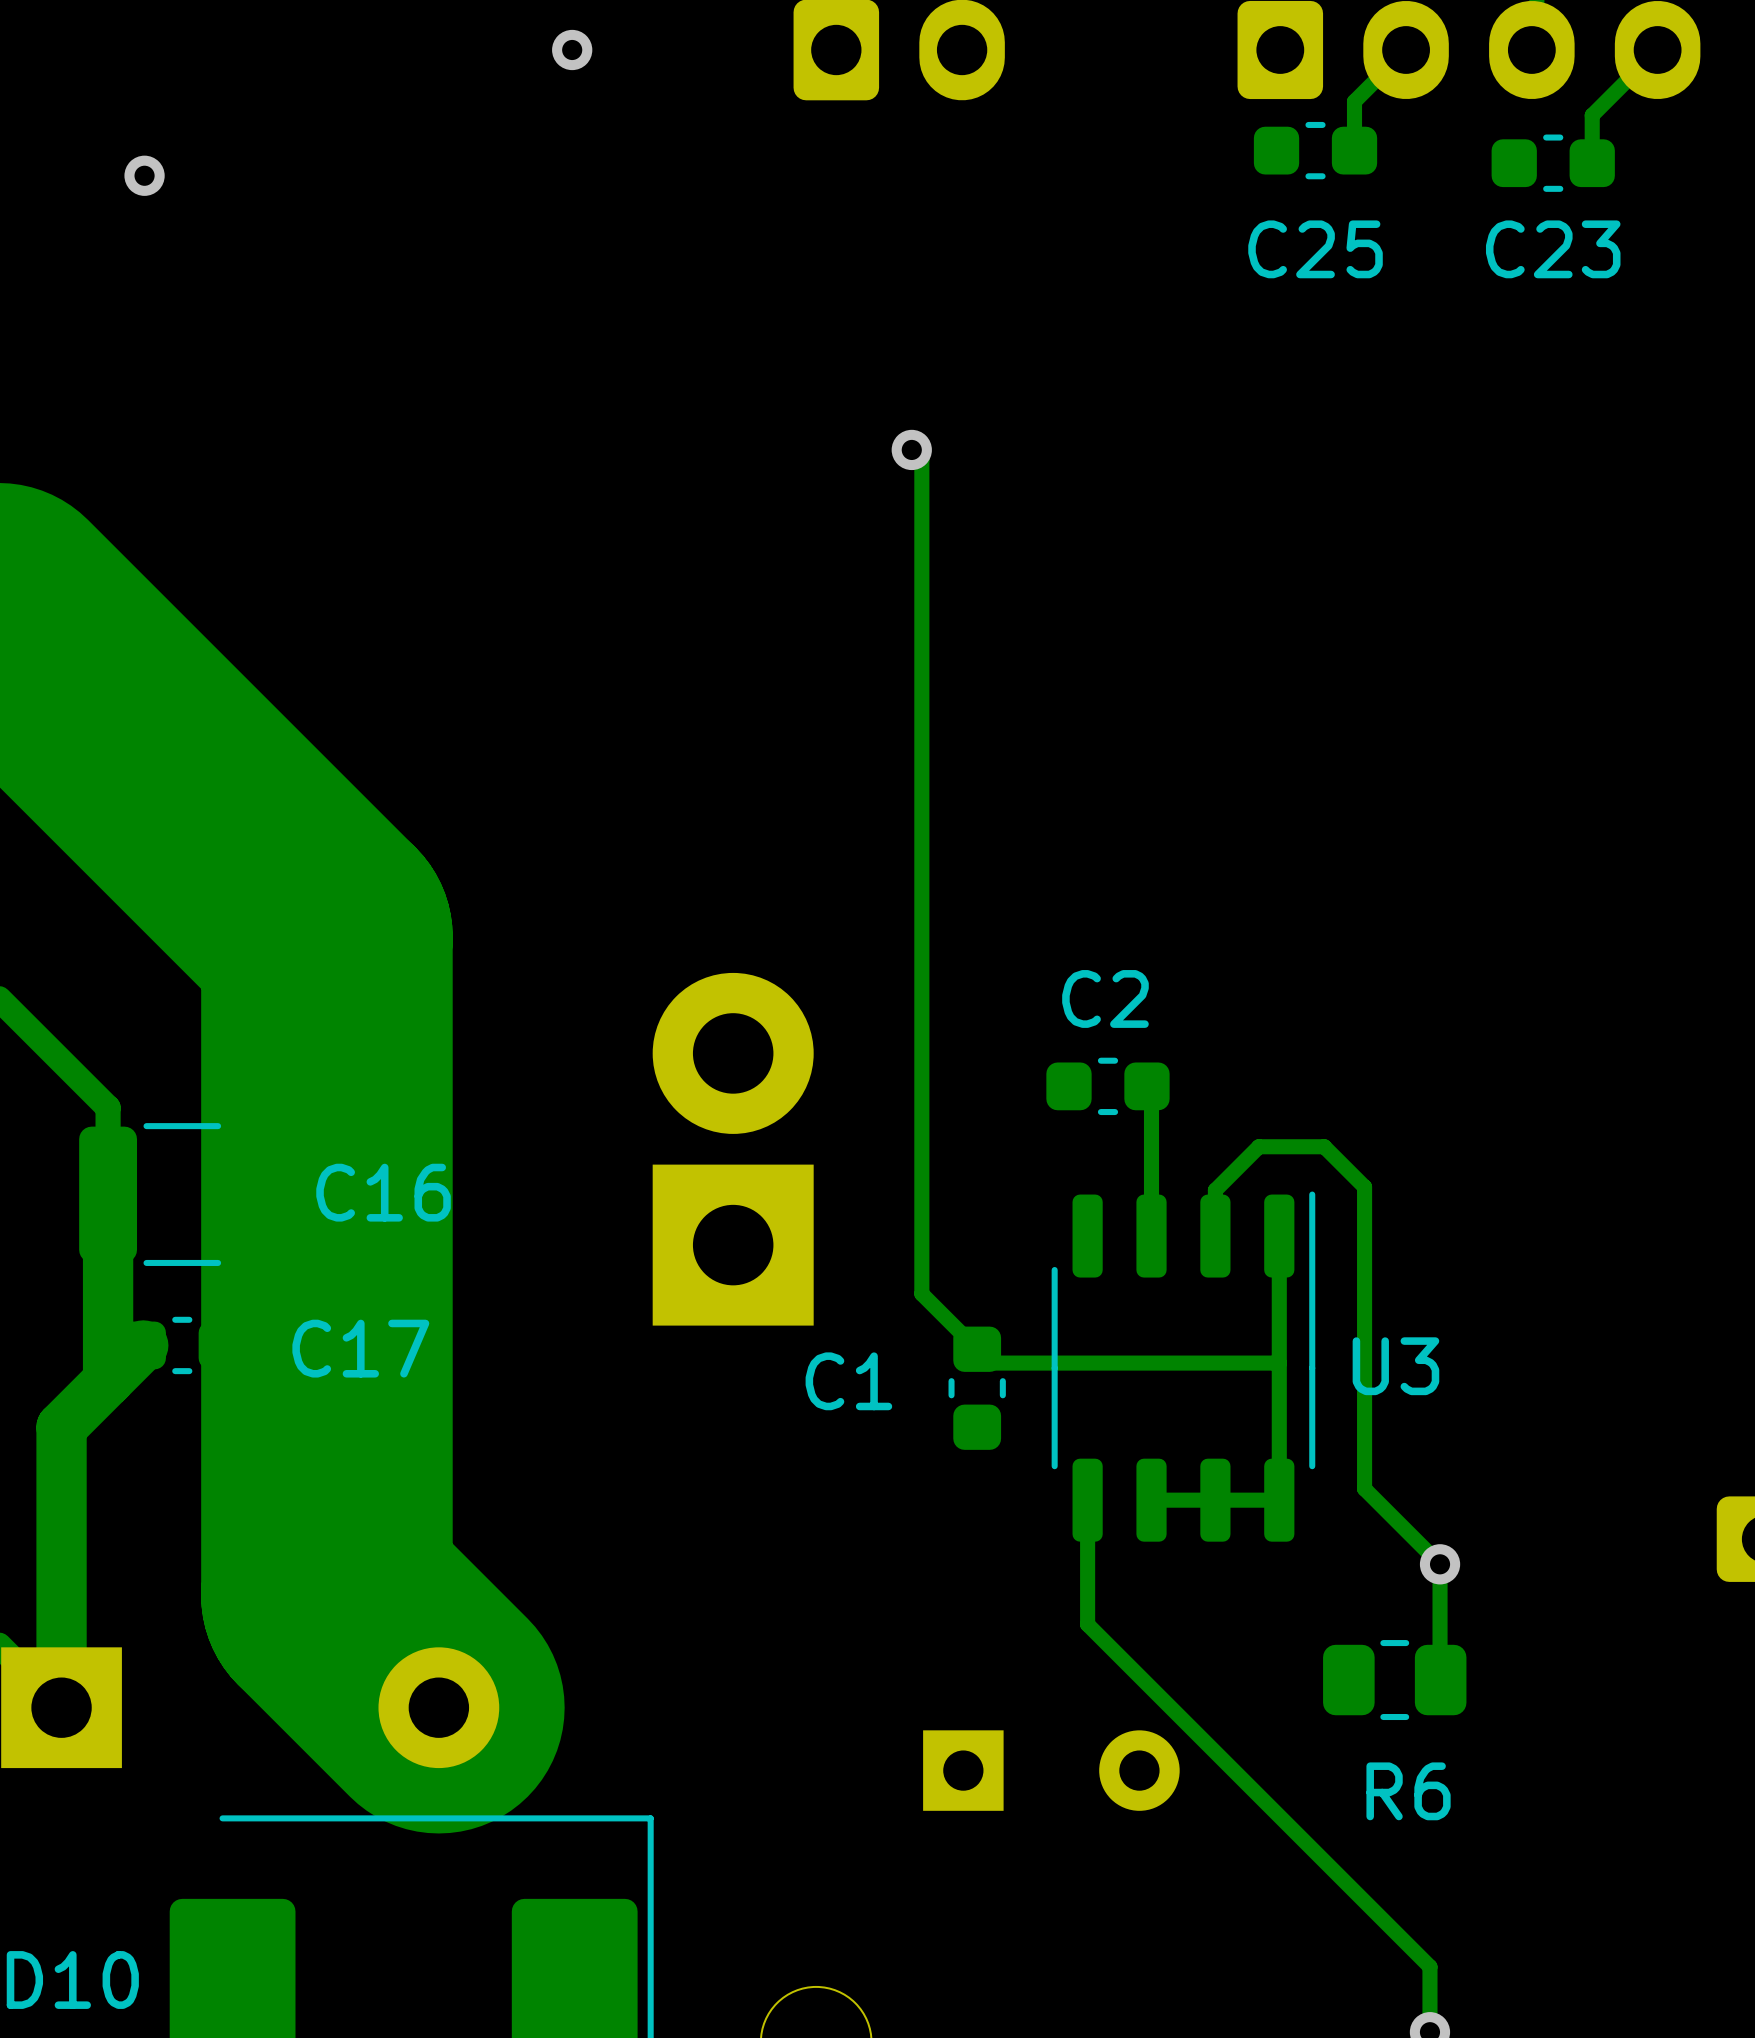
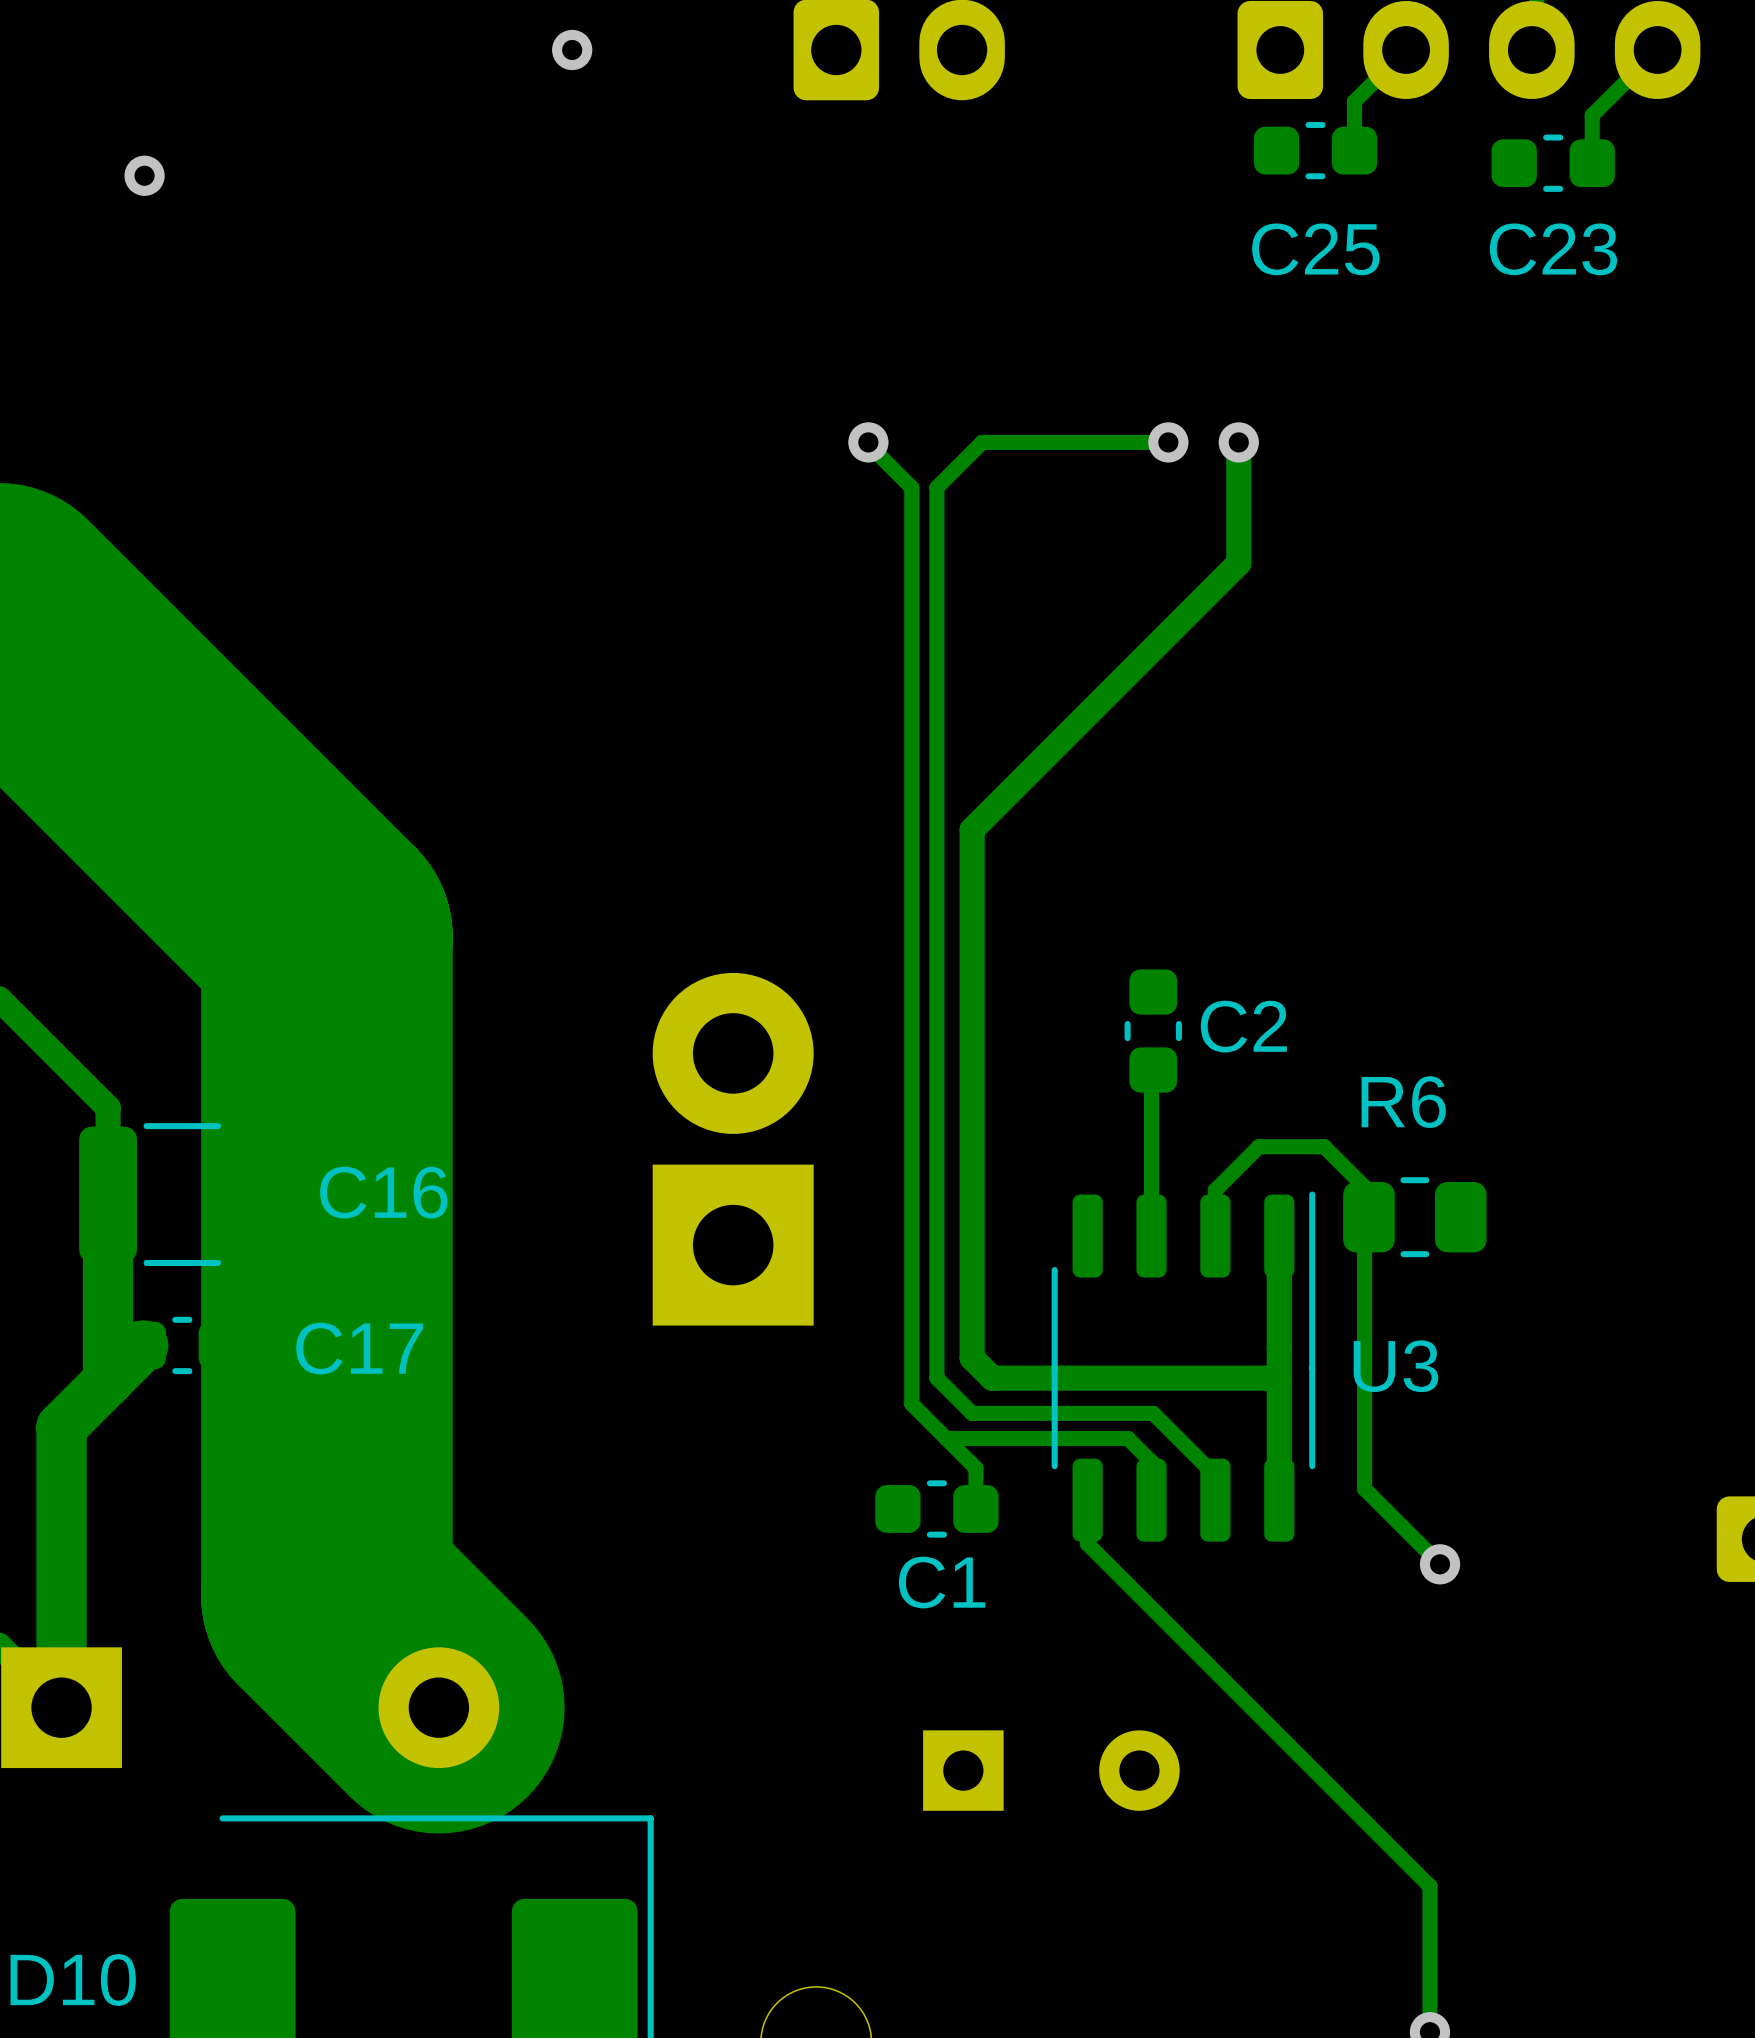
track: none -> (868, 442) (911, 487) (911, 1403) (975, 1468) (975, 1508)
track: none -> (1168, 442) (982, 442) (936, 487) (936, 1378) (972, 1413) (1153, 1413) (1215, 1475) (1215, 1500)
via: none -> (1168, 442)
track: none -> (1238, 442) (1238, 563) (972, 829) (972, 1358) (992, 1378) (1279, 1378)
via: none -> (1238, 442)
track: (911, 449) (921, 460) (921, 1293) (977, 1349) -> none
via position: (911, 449) -> (868, 442)
C2 rotation: 0° (1107, 1086) -> 90° clockwise (1153, 1031)
track width: thin (1279, 1236) (1279, 1500) -> thick (1279, 1236) (1279, 1500)
track: (1279, 1363) (991, 1363) -> none
C1 name position: C1 (848, 1381) -> C1 (942, 1582)
C1 rotation: 0° (977, 1388) -> 90° clockwise (936, 1508)
C1 position: (977, 1388) -> (936, 1508)
track: (1279, 1500) (1151, 1500) -> (946, 1438) (1128, 1438) (1151, 1461) (1151, 1500)
track: (1087, 1543) (1087, 1624) (1429, 1966) -> (1087, 1543) (1429, 1886) (1429, 1966)
track: (1440, 1564) (1440, 1679) -> none
R6 position: (1394, 1680) -> (1414, 1217)
R6 name position: R6 (1408, 1791) -> R6 (1403, 1102)

